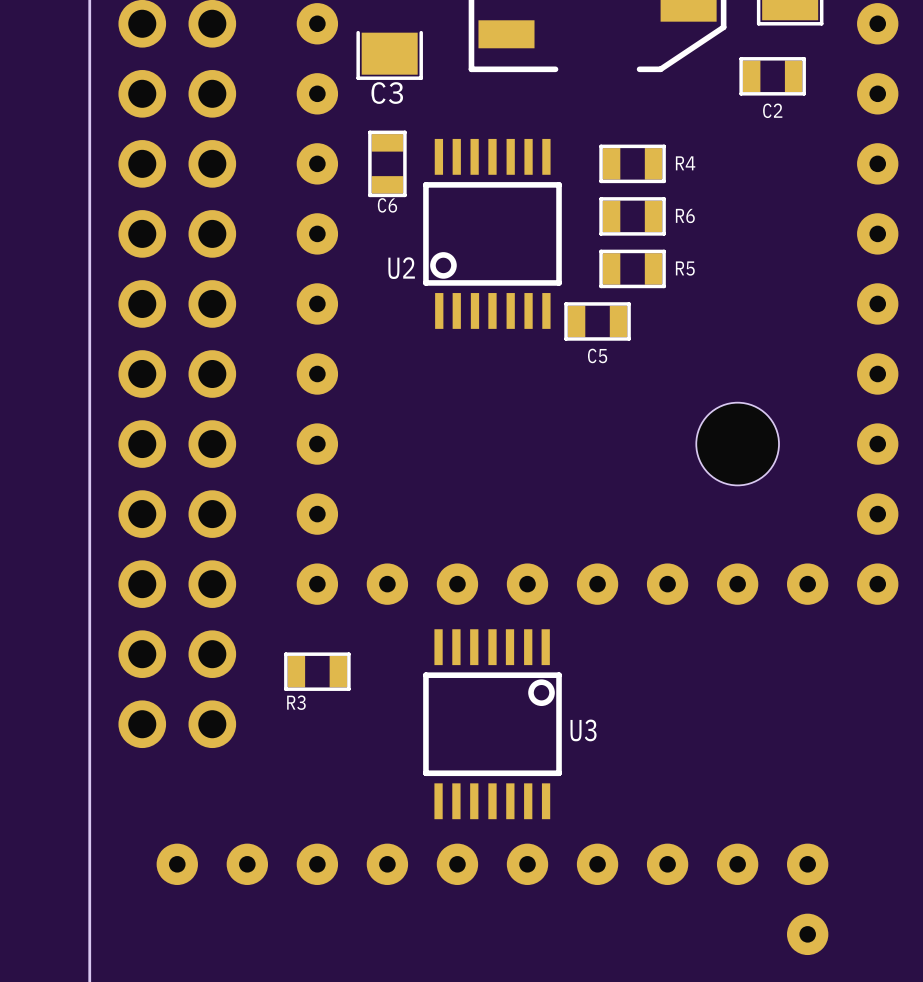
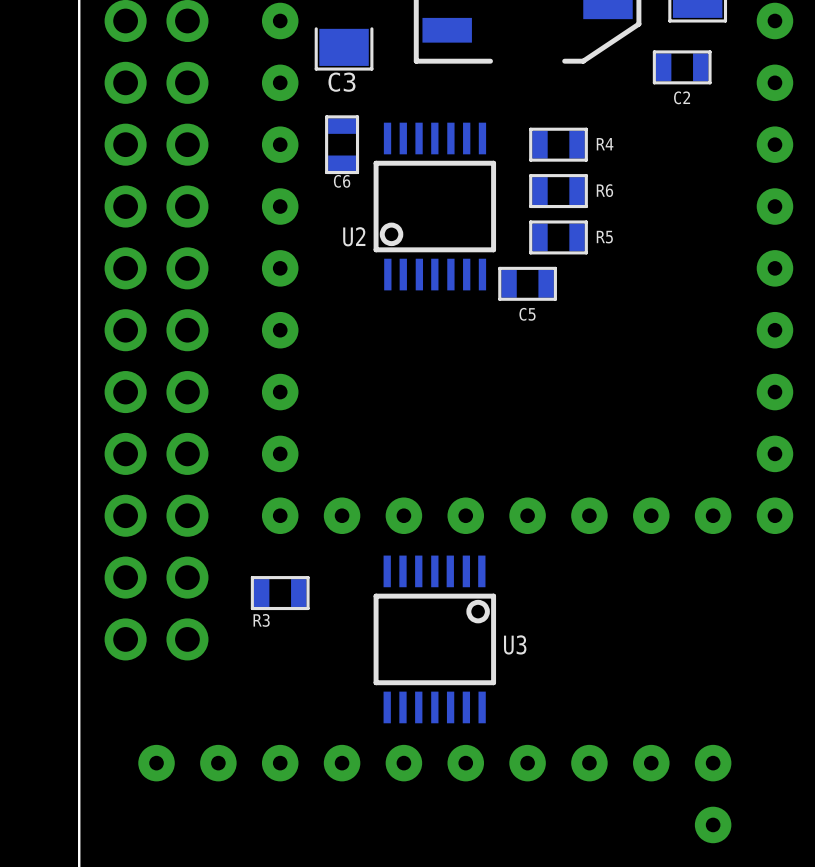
part: (737, 444) -> none

